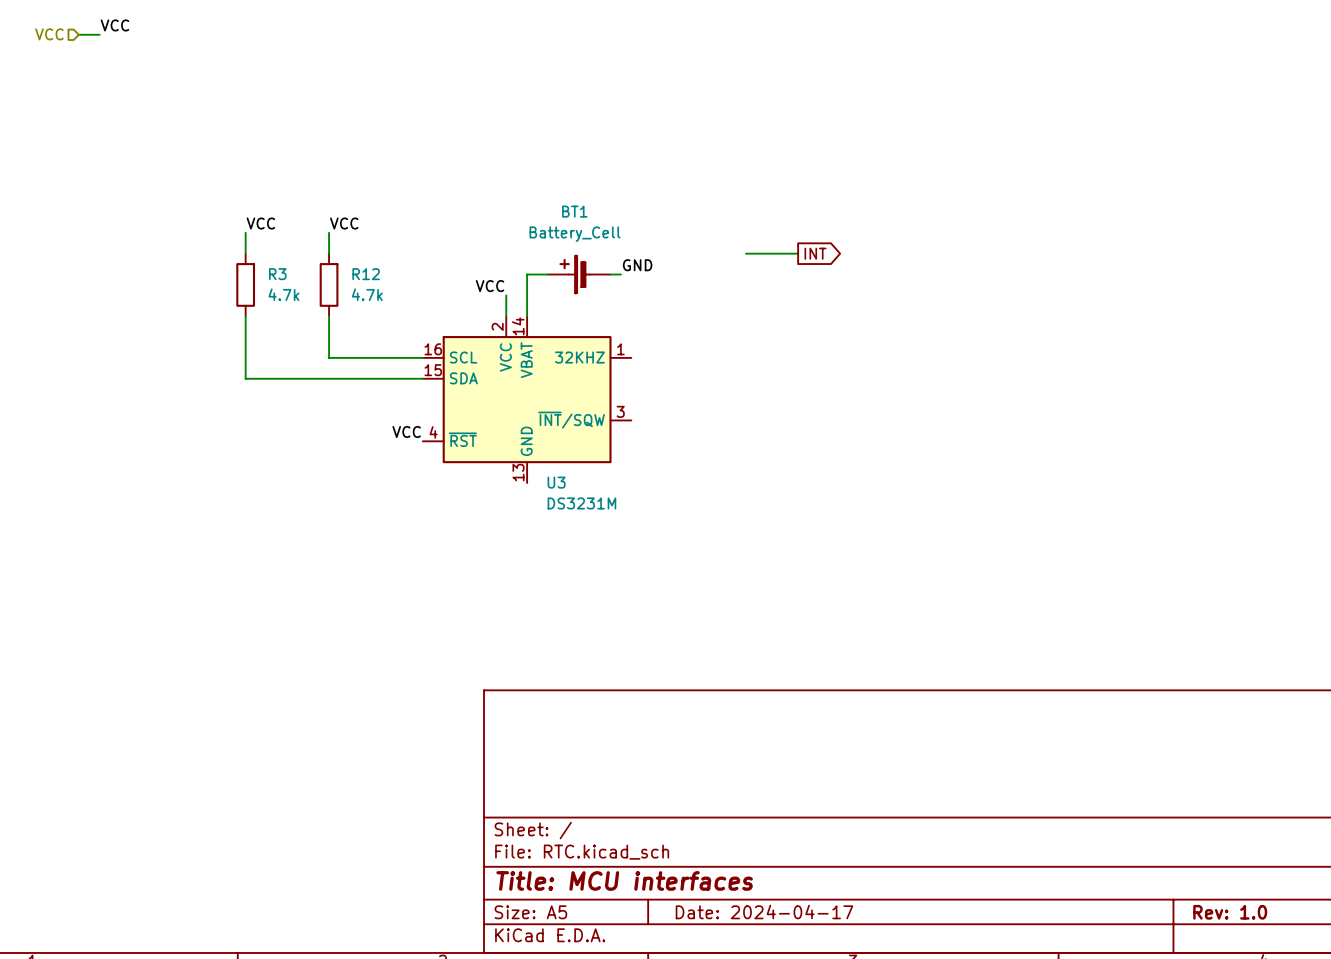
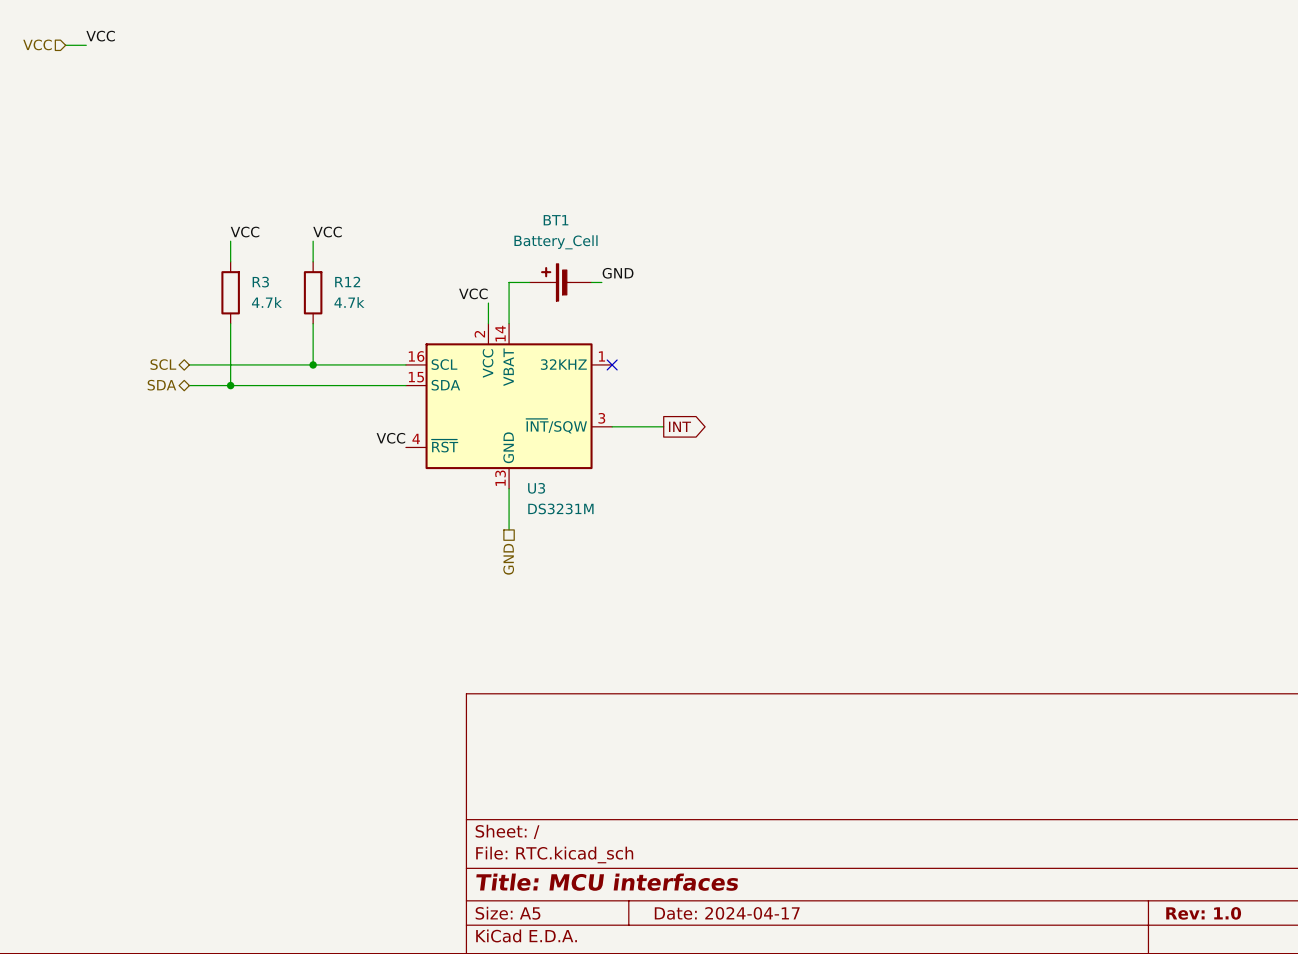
wire: (746, 253) (798, 253) -> (612, 426) (663, 426)
global label position: INT (815, 253) -> INT (680, 426)
hierarchical label: none -> SCL (163, 364)
wire: none -> (189, 364) (313, 364)
junction: none -> (313, 364)
no-connect mark: none -> (612, 364)
hierarchical label: none -> SDA (161, 385)
wire: none -> (189, 385) (230, 385)
junction: none -> (230, 385)
wire: none -> (509, 488) (509, 529)
hierarchical label: none -> GND (508, 559)

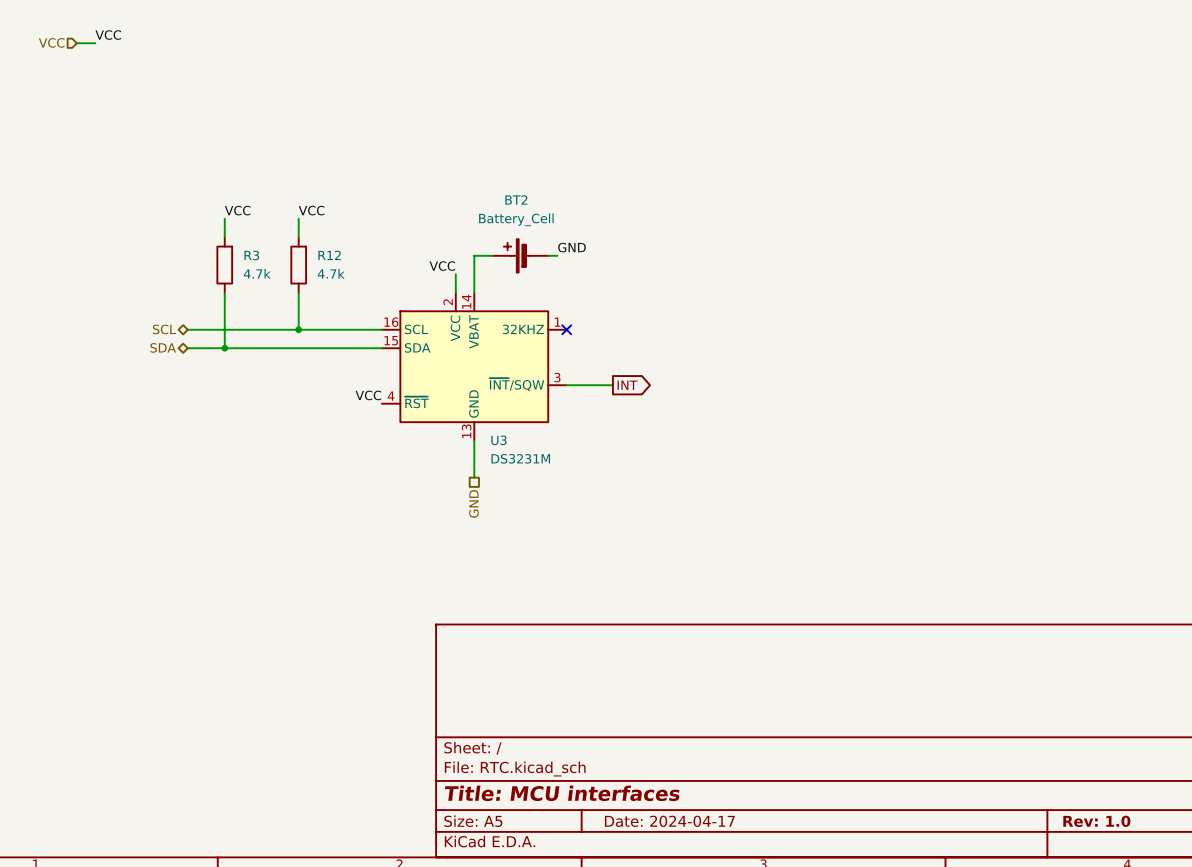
BT1 name: BT1 (556, 220) -> BT2 (516, 199)

